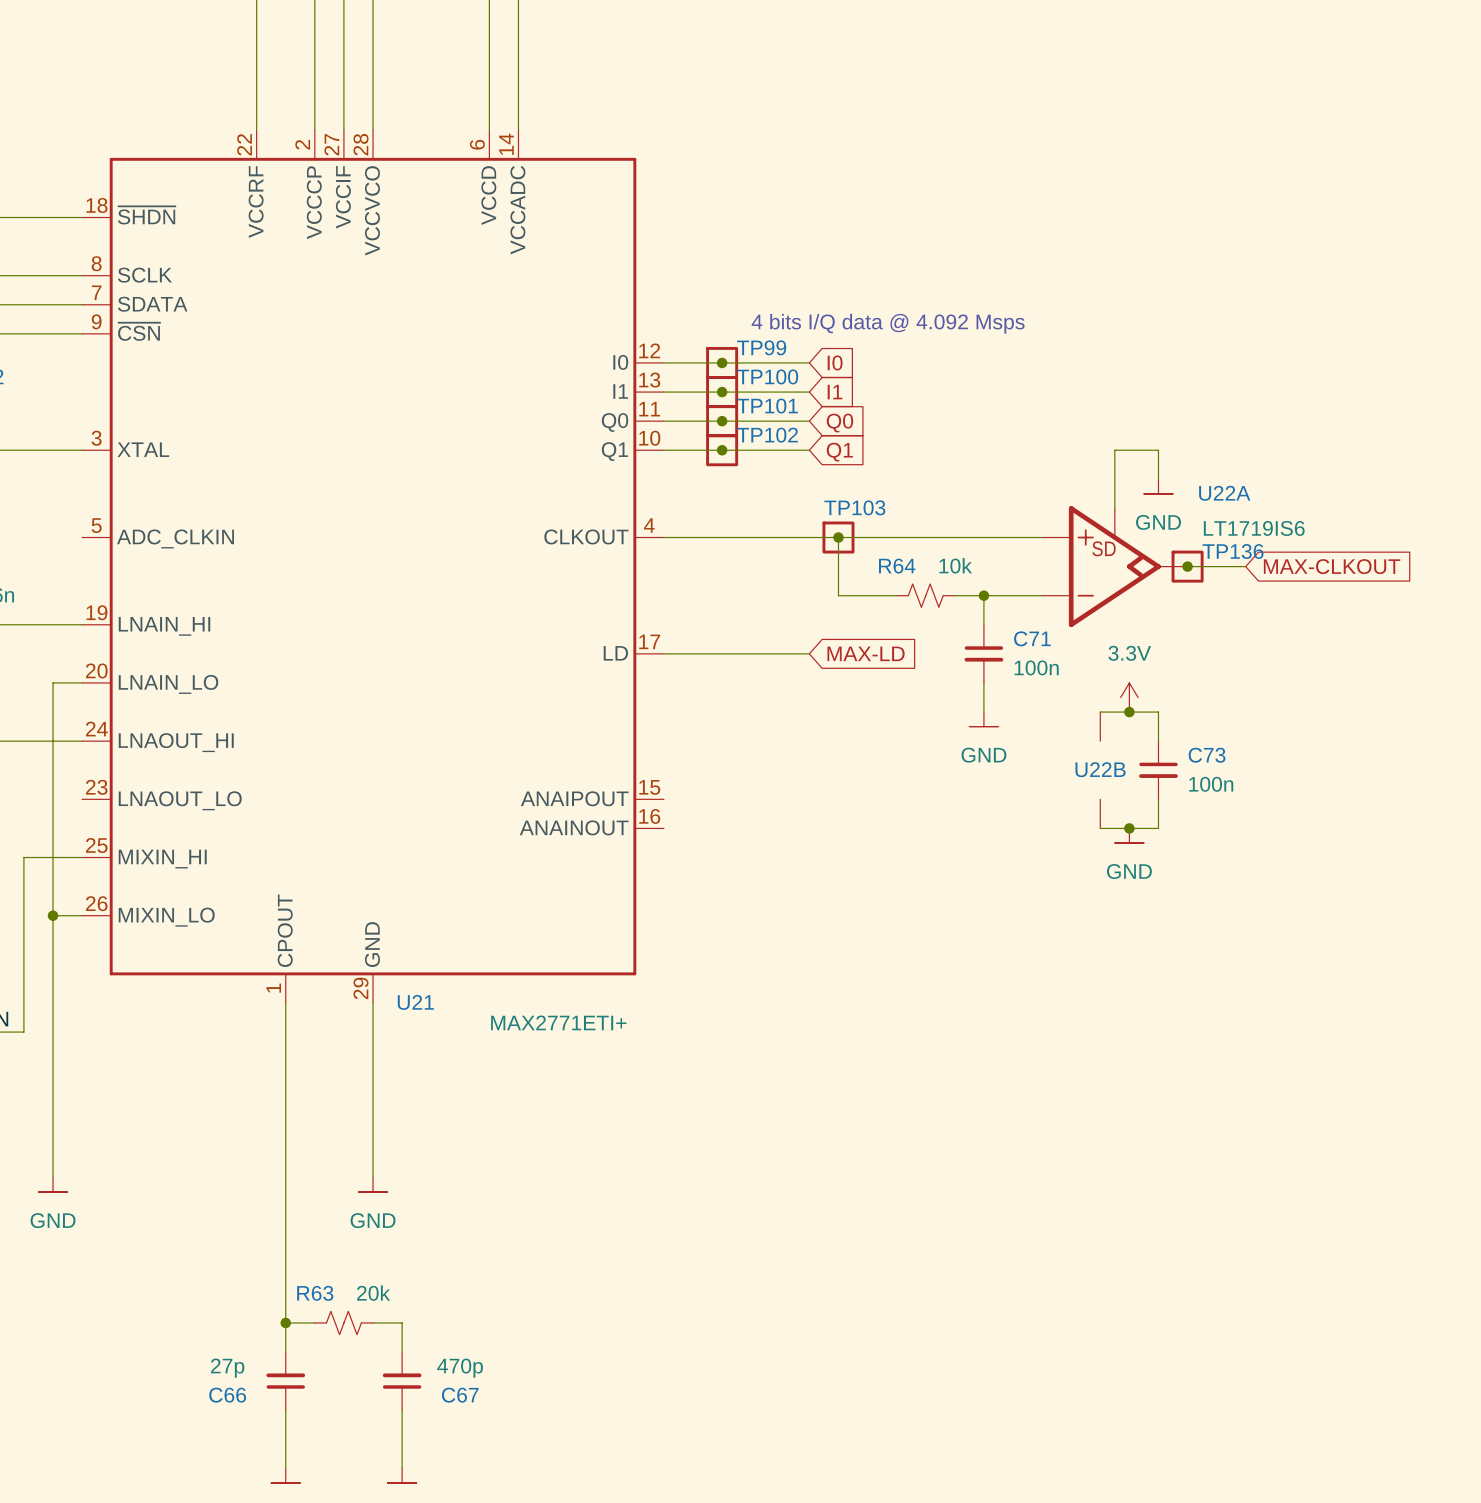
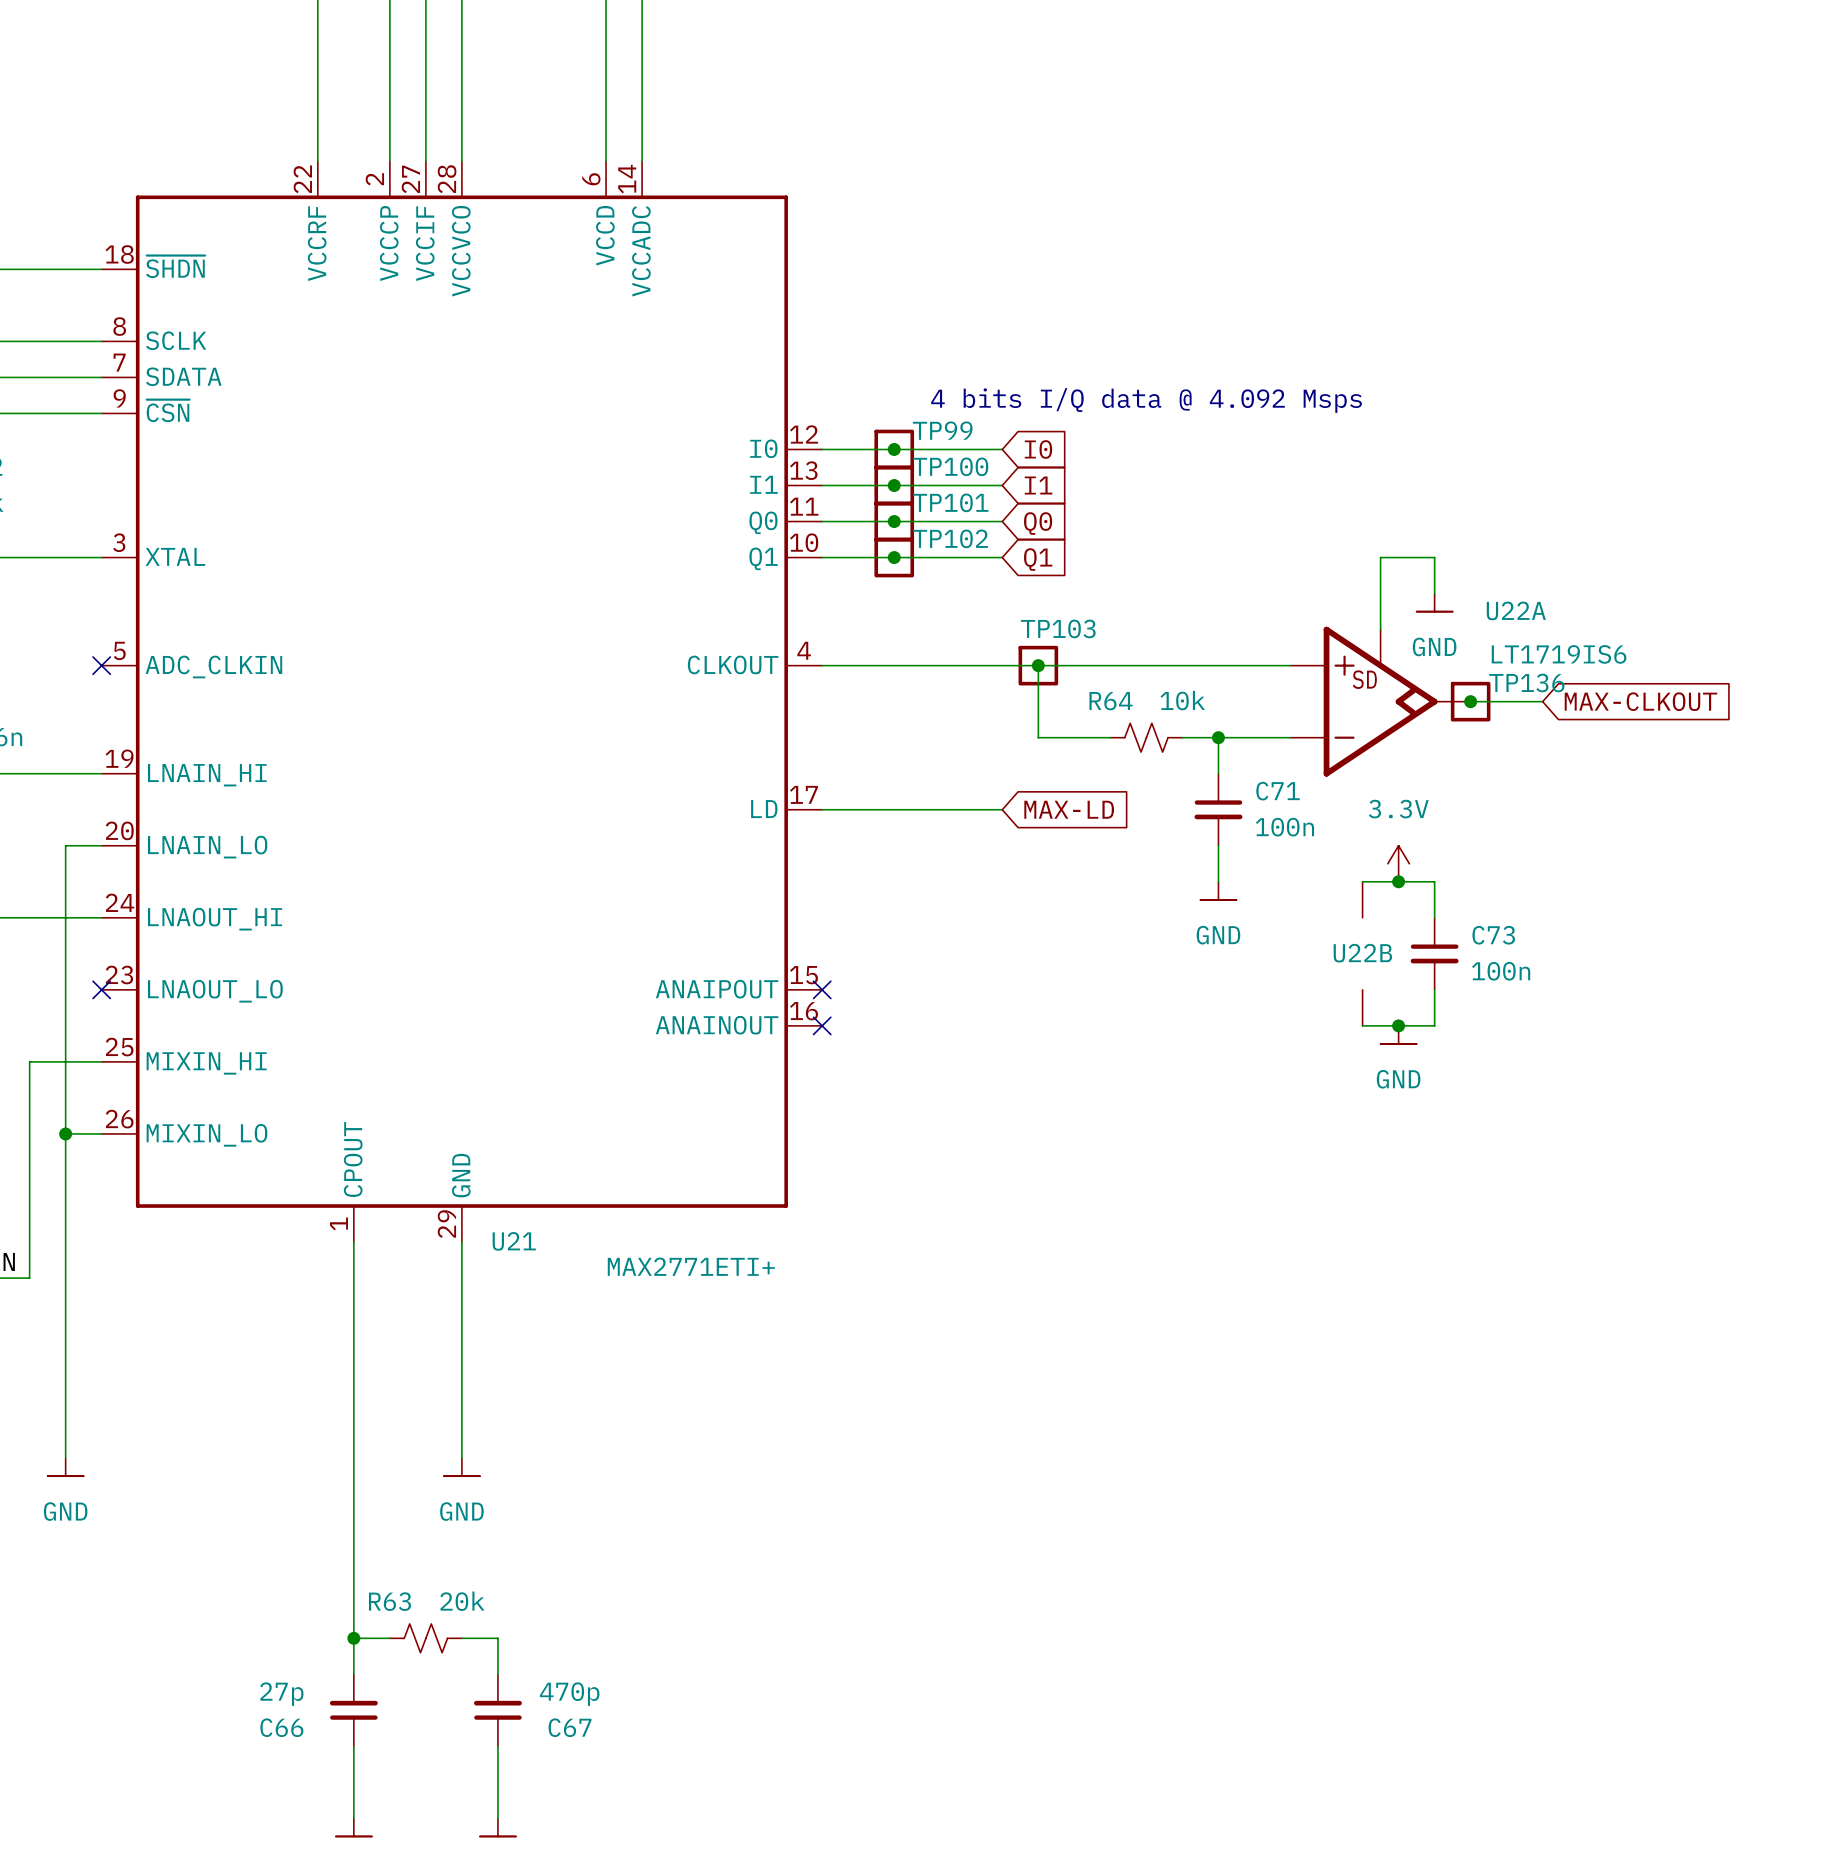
no-connect mark: none -> (101, 665)
no-connect mark: none -> (101, 989)
no-connect mark: none -> (822, 989)
no-connect mark: none -> (822, 1025)

